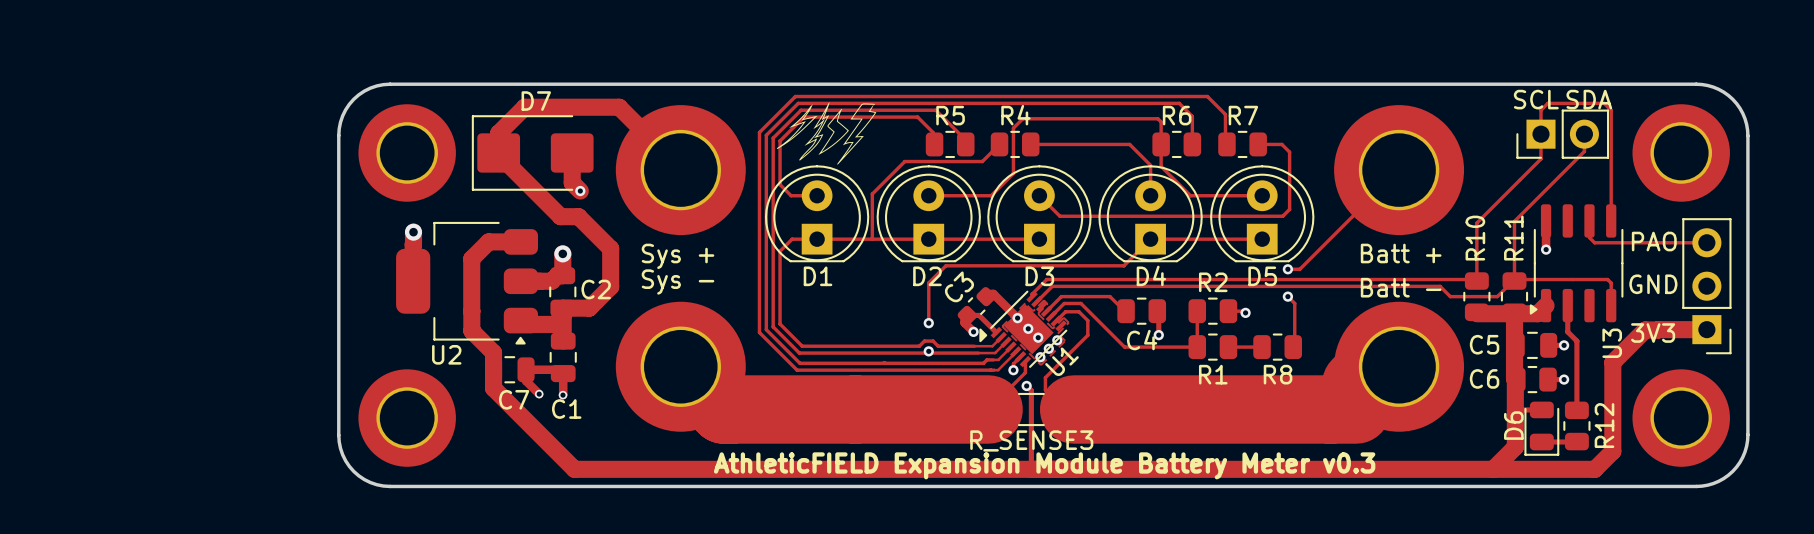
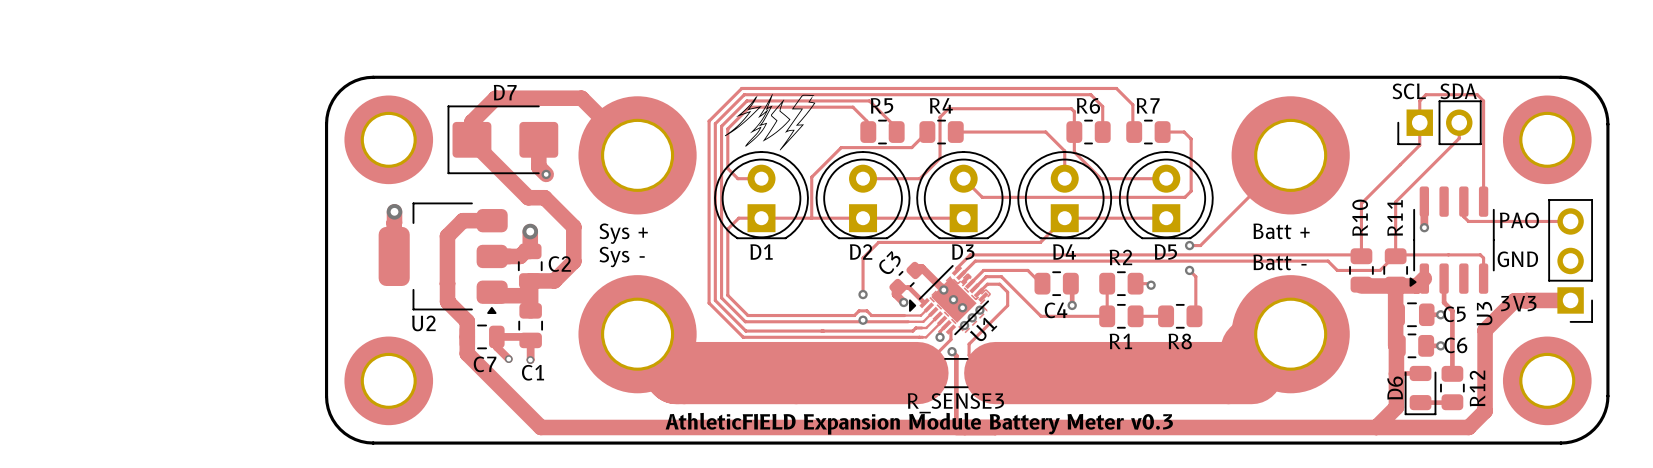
C5 name position: C5 (1484, 344) -> C5 (1454, 314)
C6 name position: C6 (1484, 378) -> C6 (1455, 345)

